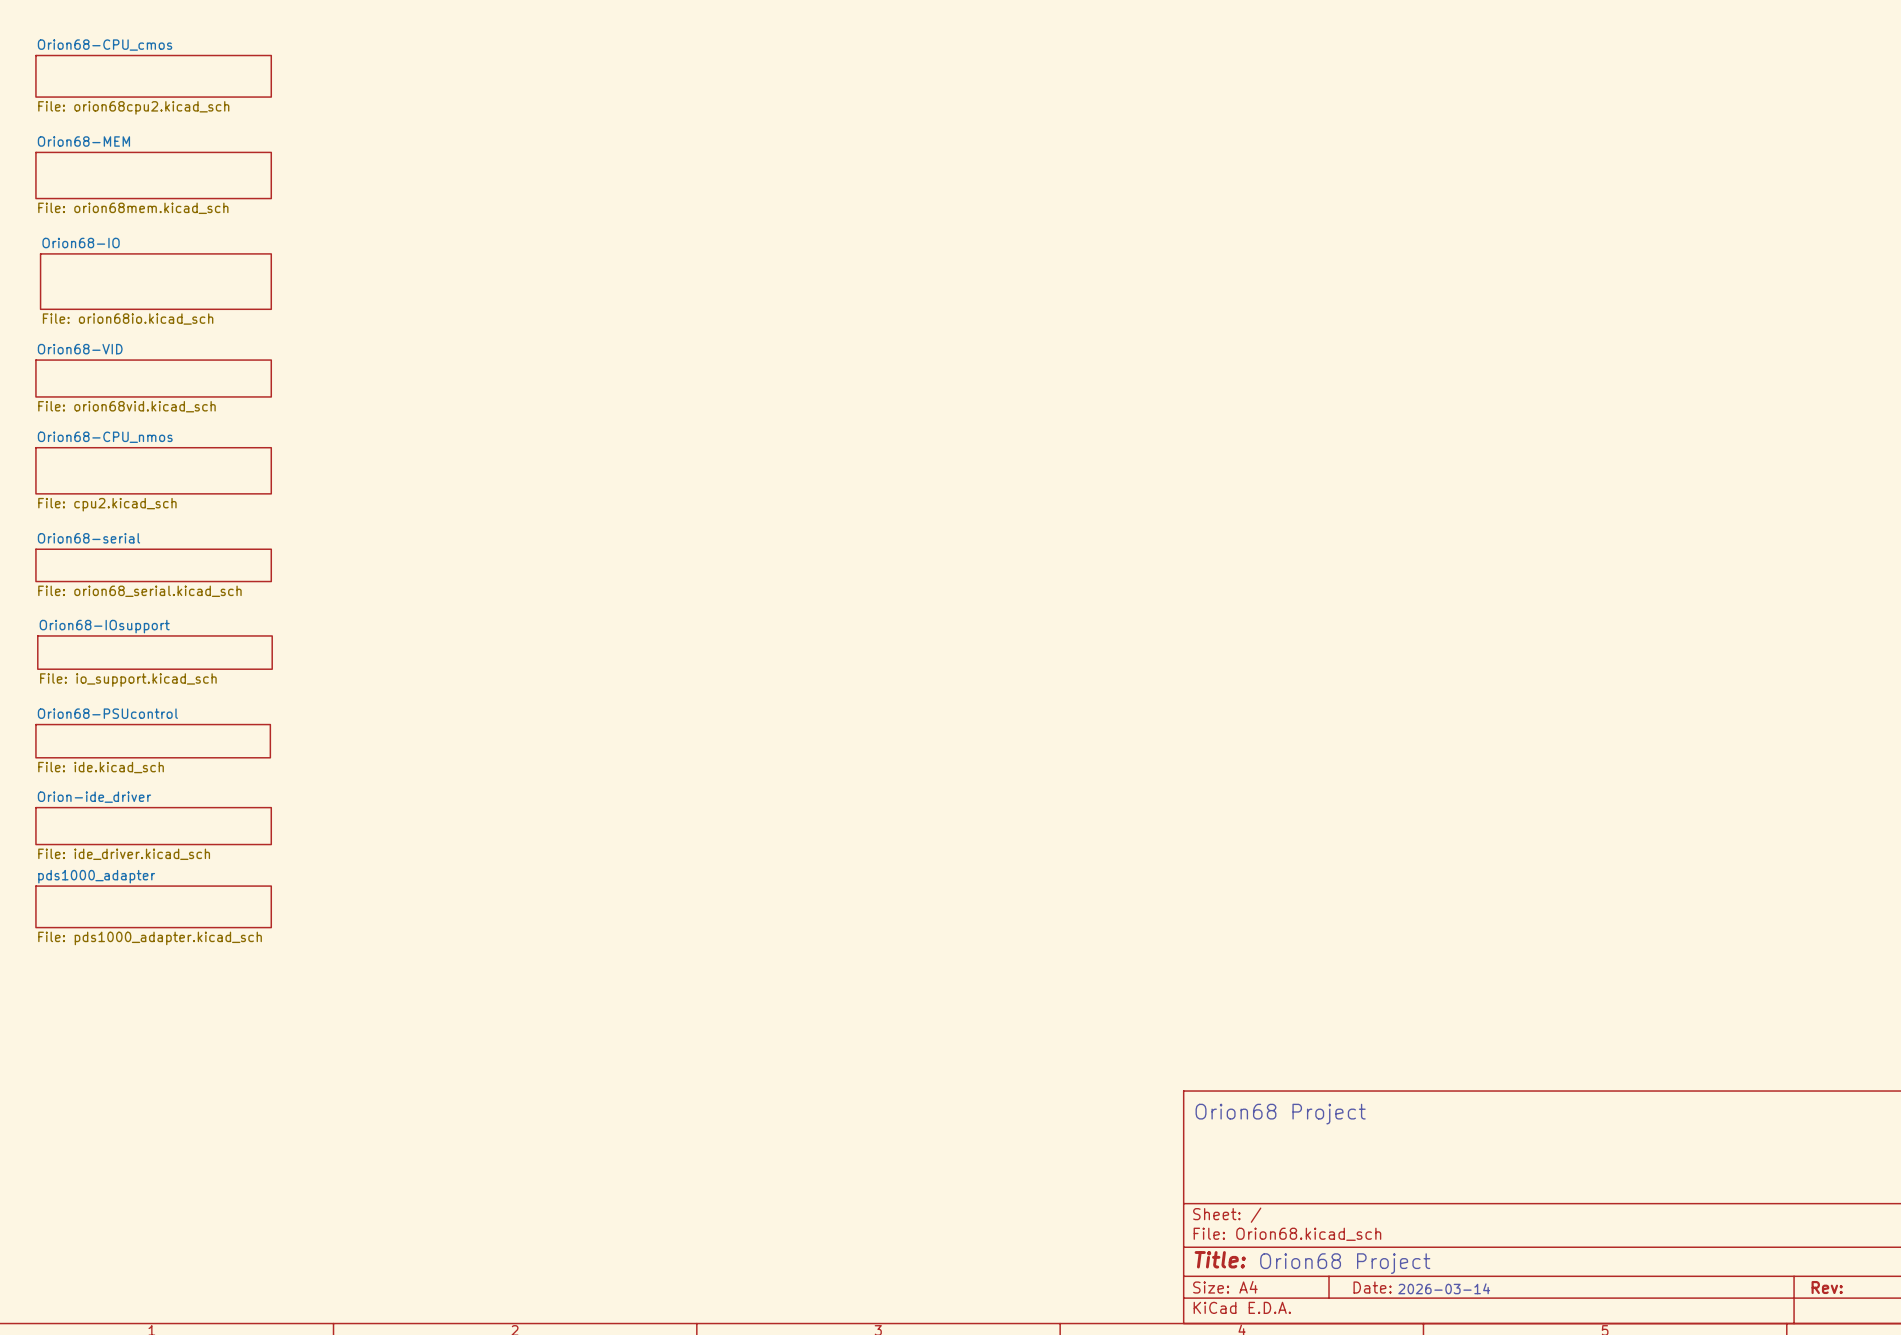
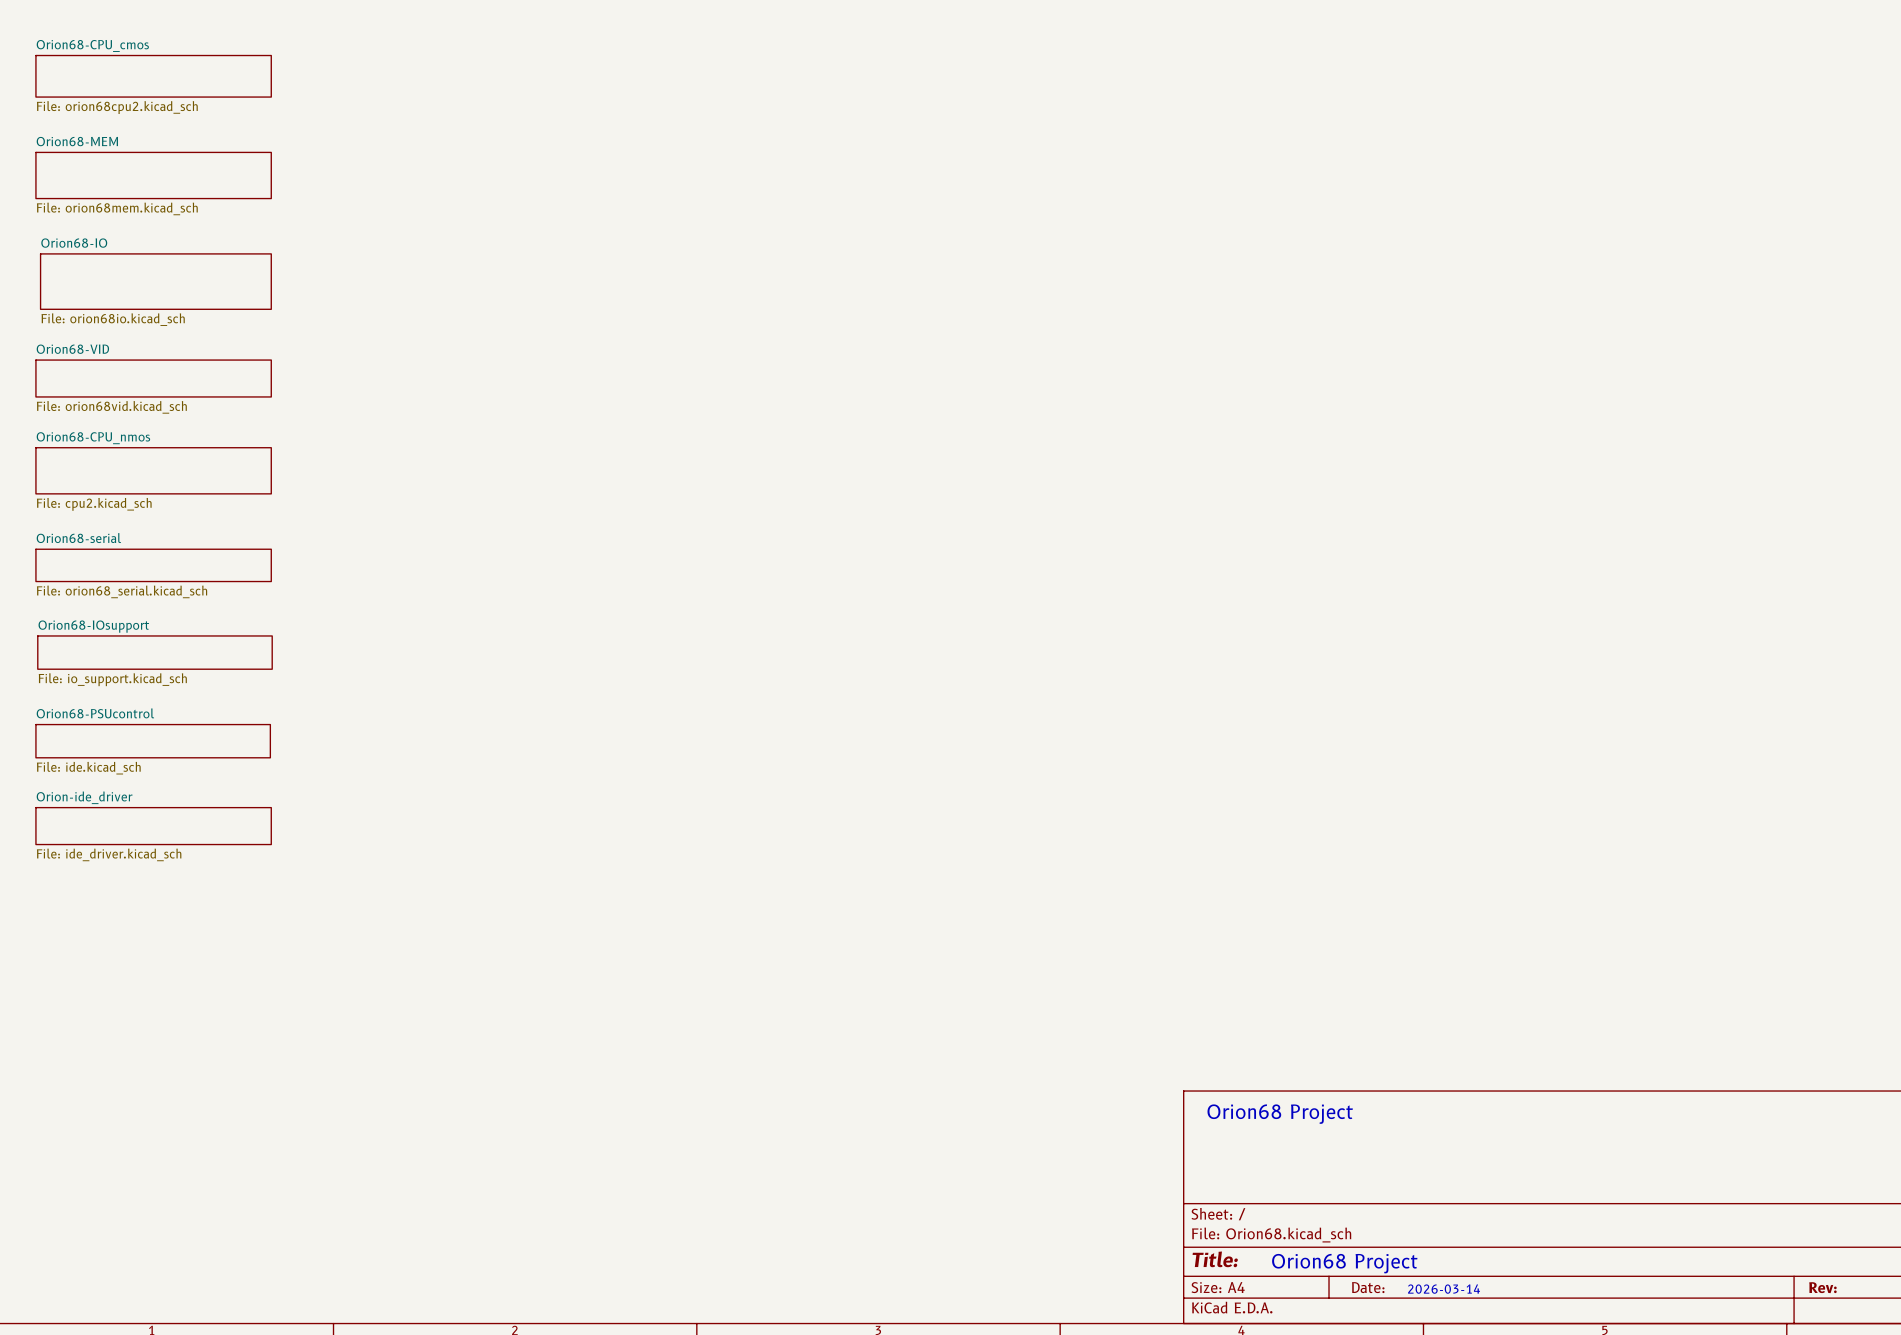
sheet pds1000_adapter: File: pds1000_adapter.kicad_sch (153, 906) -> none

